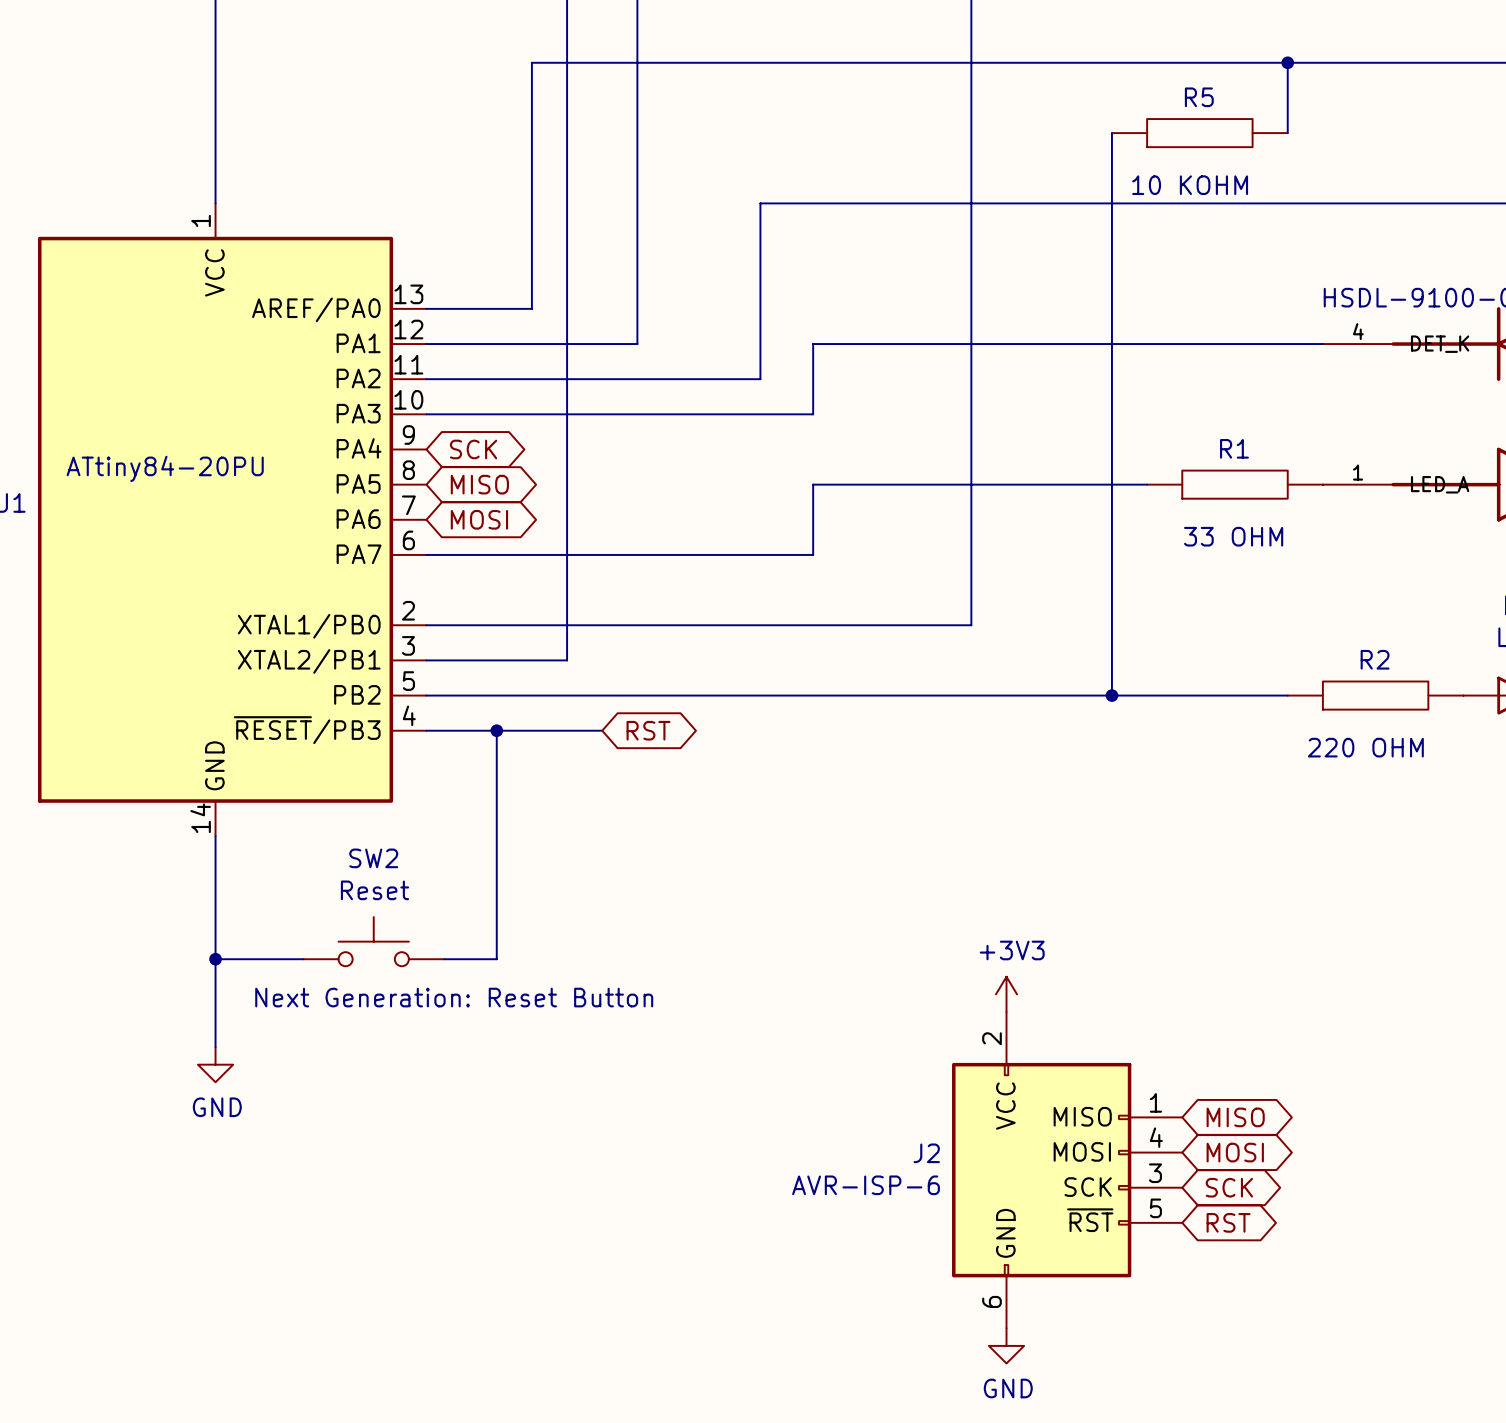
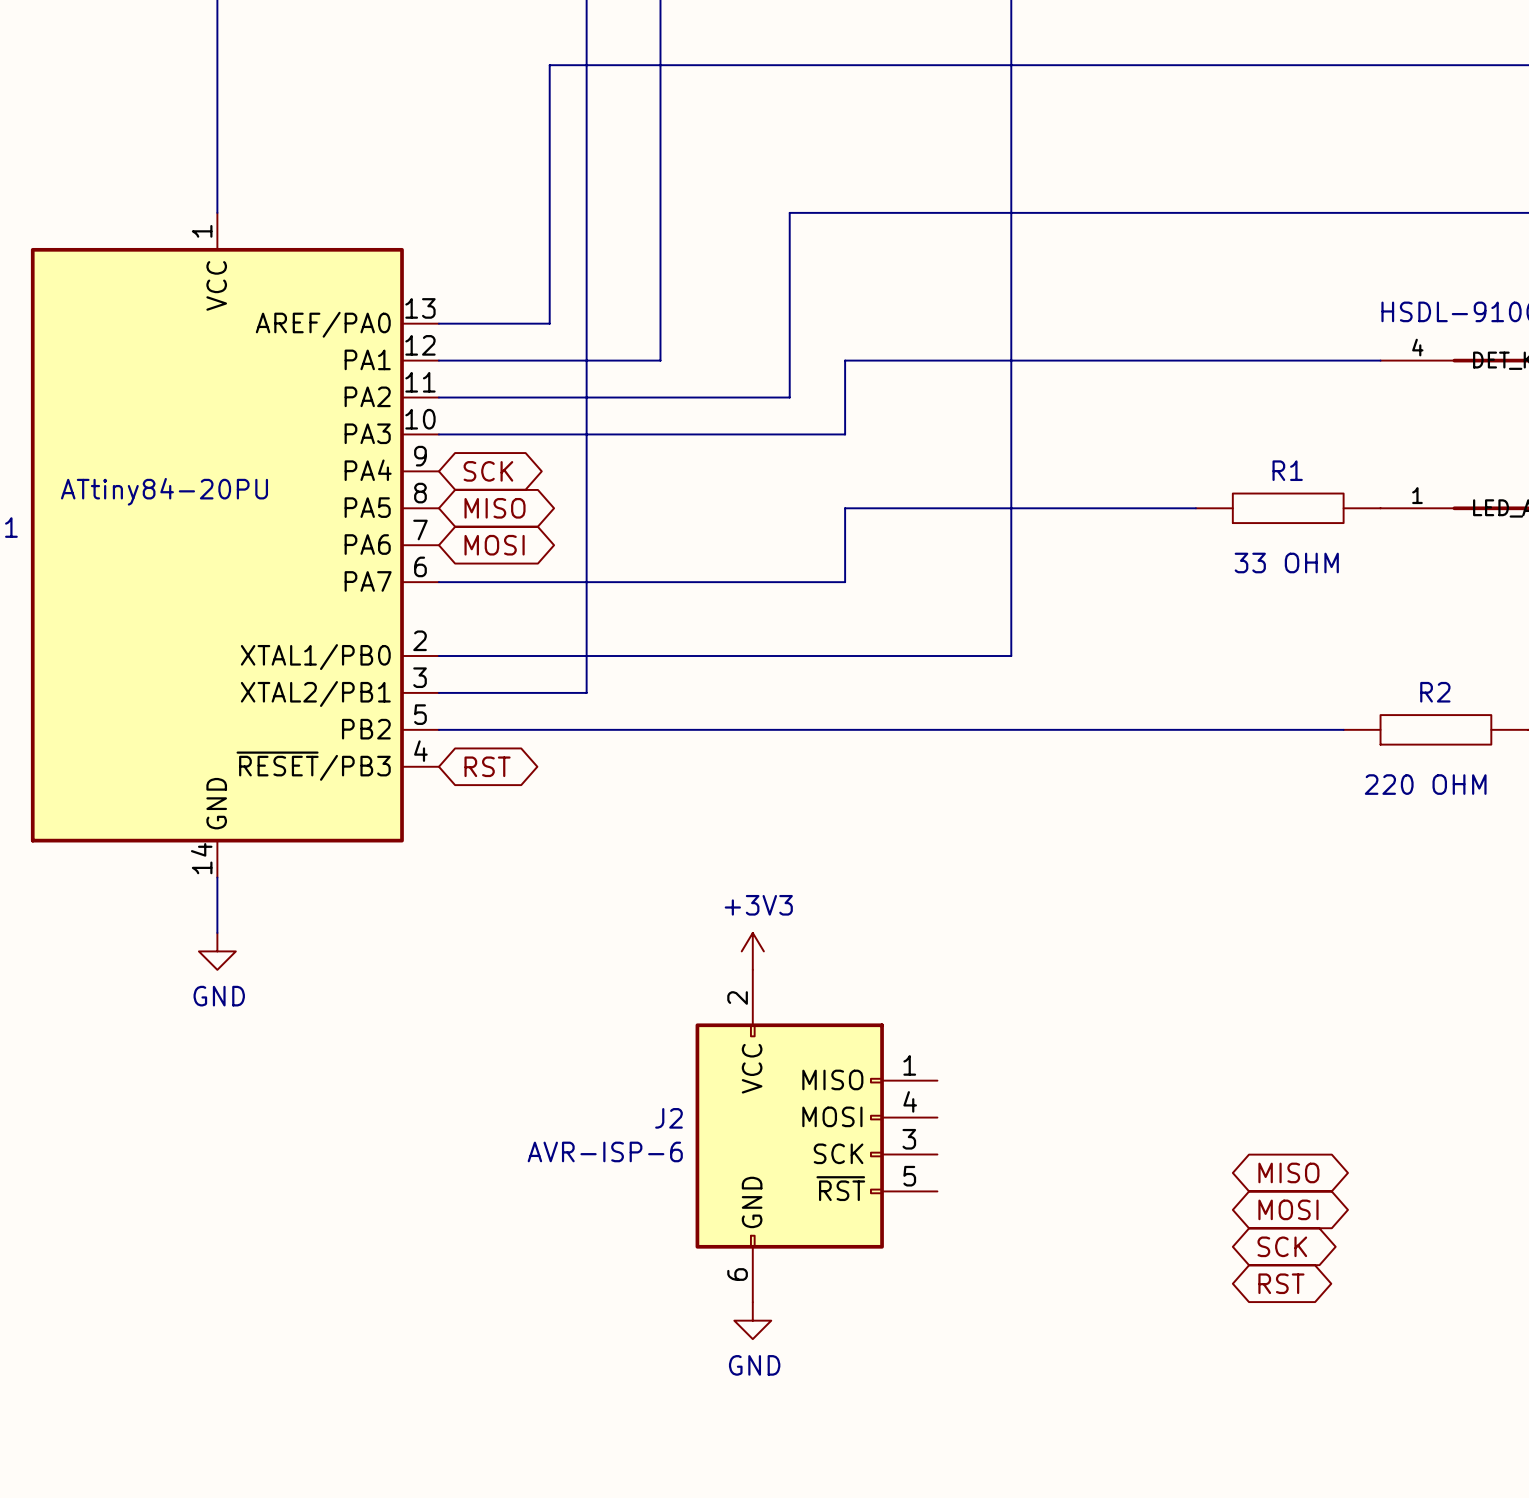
wire: (1287, 62) (1287, 133) -> none
junction: (1287, 62) -> none
wire: (1111, 133) (1111, 695) -> none
R5: 10 KOHM (1199, 133) -> none
junction: (1111, 695) -> none
wire: (426, 730) (602, 730) -> none
wire: (496, 730) (496, 959) (444, 959) -> none
junction: (496, 730) -> none
global label position: RST (648, 730) -> RST (487, 766)
wire: (215, 888) (215, 1047) -> none
SW2: Reset (373, 941) -> none
wire: (215, 959) (303, 959) -> none
junction: (215, 959) -> none
power symbol position: +3V3 (1006, 994) -> +3V3 (752, 951)
text: Next Generation: Reset Button (454, 997) -> none
power symbol position: GND (215, 1064) -> GND (217, 951)
J2 position: (1067, 1170) -> (816, 1136)
power symbol: none -> GND (752, 1320)
power symbol: GND (1006, 1345) -> none

